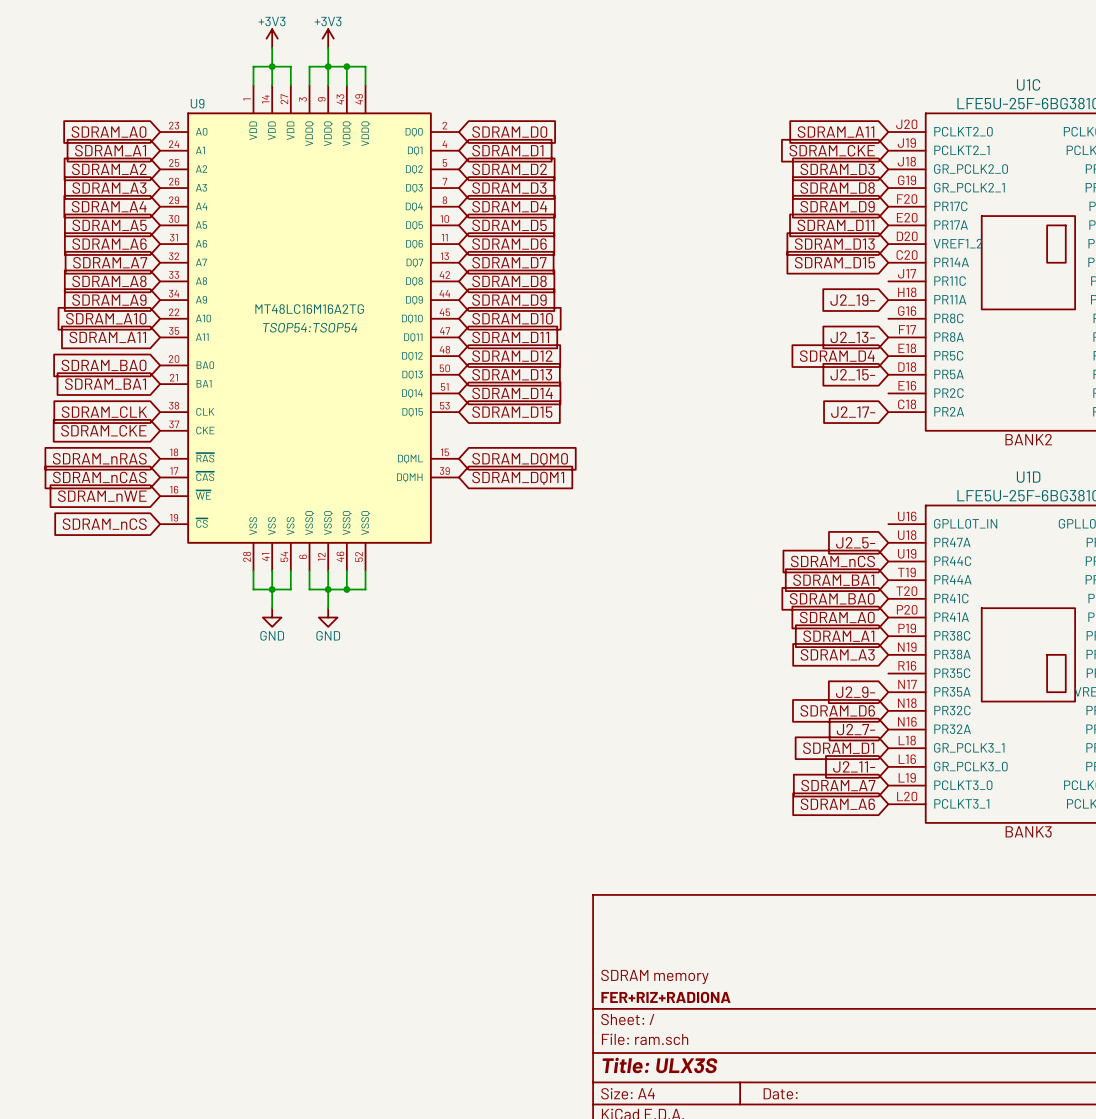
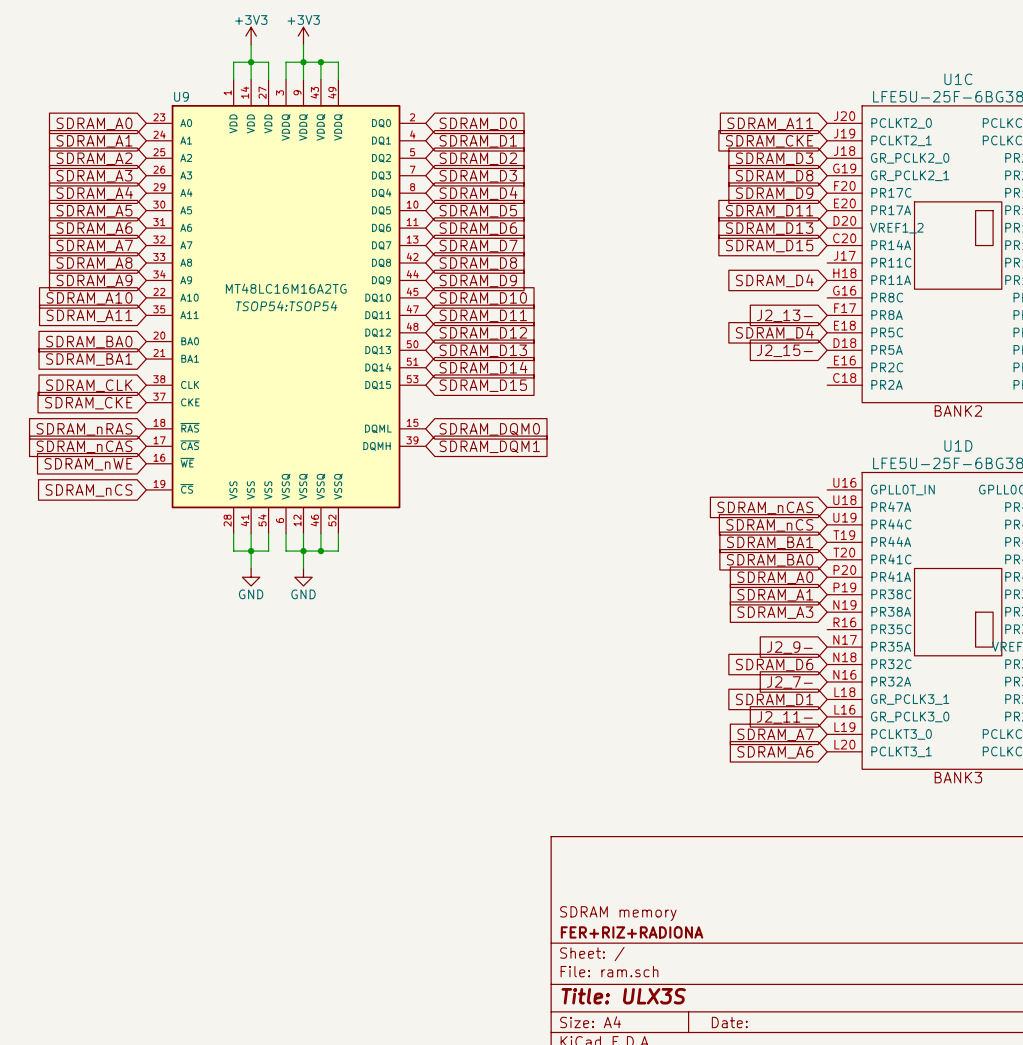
global label: J2_19- (852, 300) -> SDRAM_D4 (774, 280)
global label: J2_17- (853, 412) -> none
global label: J2_5- (855, 542) -> SDRAM_nCAS (765, 507)

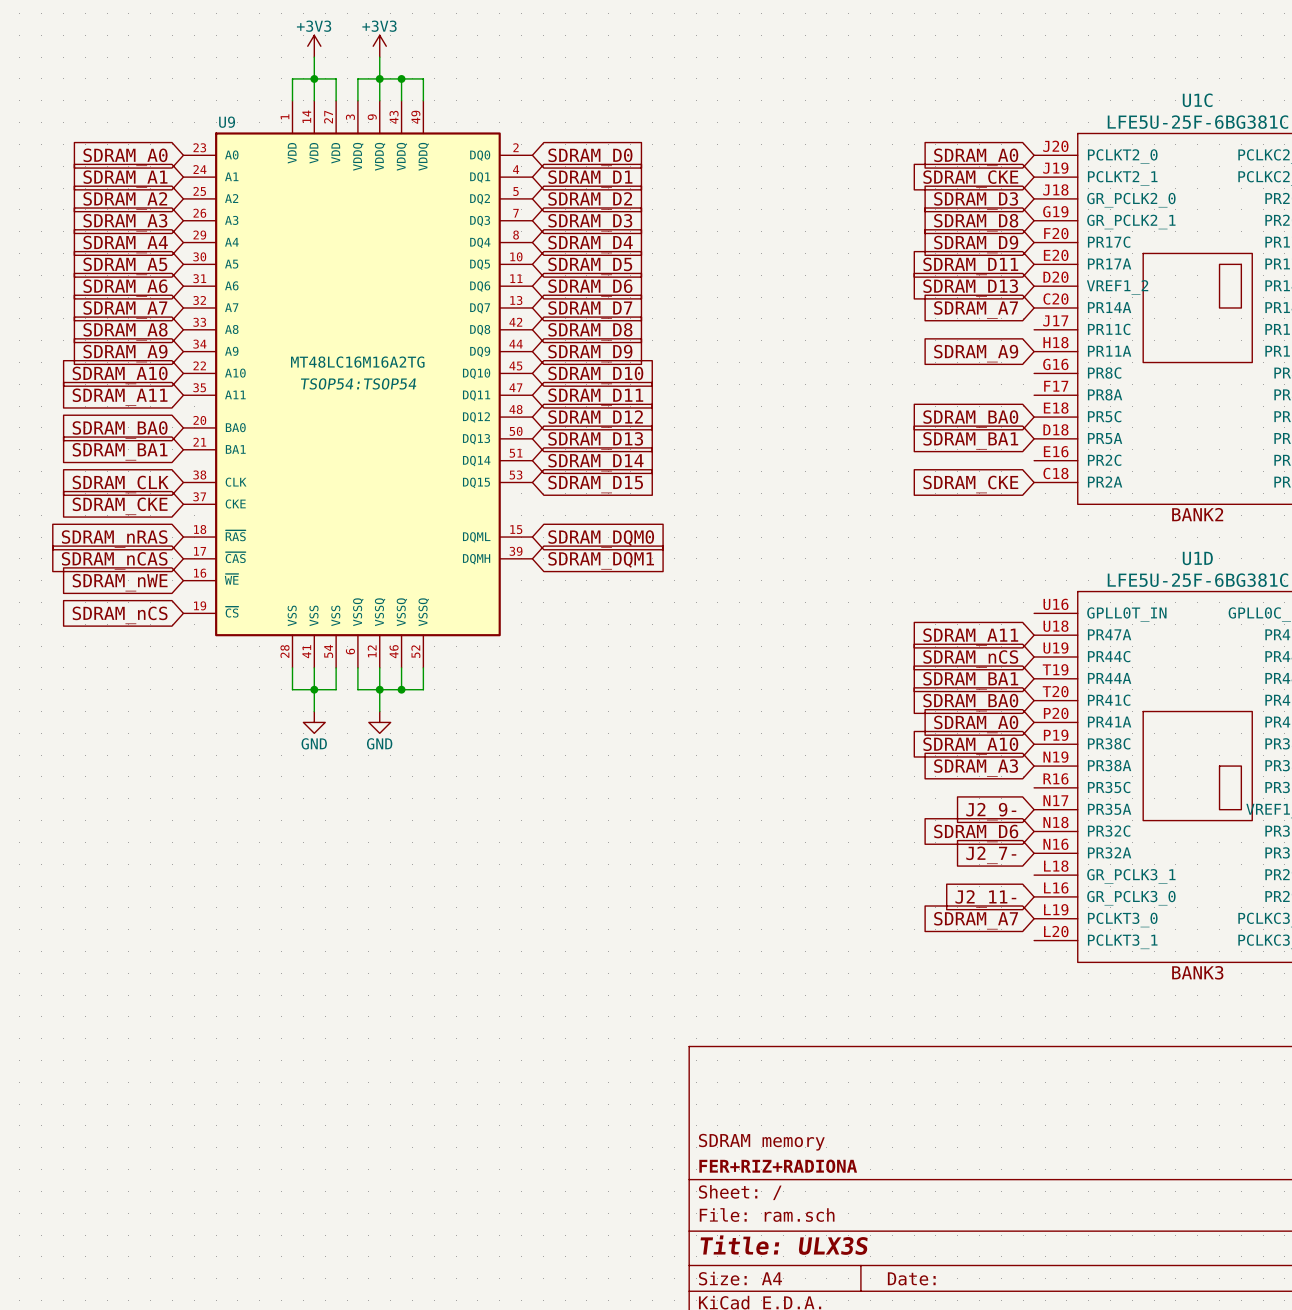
global label: SDRAM_A11 (770, 123) -> SDRAM_A0 (976, 157)
global label: SDRAM_D15 (769, 246) -> SDRAM_A7 (976, 309)
global label: SDRAM_D4 (774, 280) -> SDRAM_A9 (976, 353)
global label: J2_13- (784, 315) -> none
global label: SDRAM_D4 (774, 333) -> SDRAM_BA0 (970, 419)
global label: J2_15- (784, 350) -> SDRAM_BA1 (970, 440)
global label: none -> SDRAM_CKE (970, 484)
global label: SDRAM_nCAS (765, 507) -> SDRAM_A11 (970, 637)
global label: SDRAM_A1 (775, 595) -> SDRAM_A10 (970, 746)
global label: SDRAM_D1 (774, 699) -> none
global label: SDRAM_A6 (775, 752) -> none

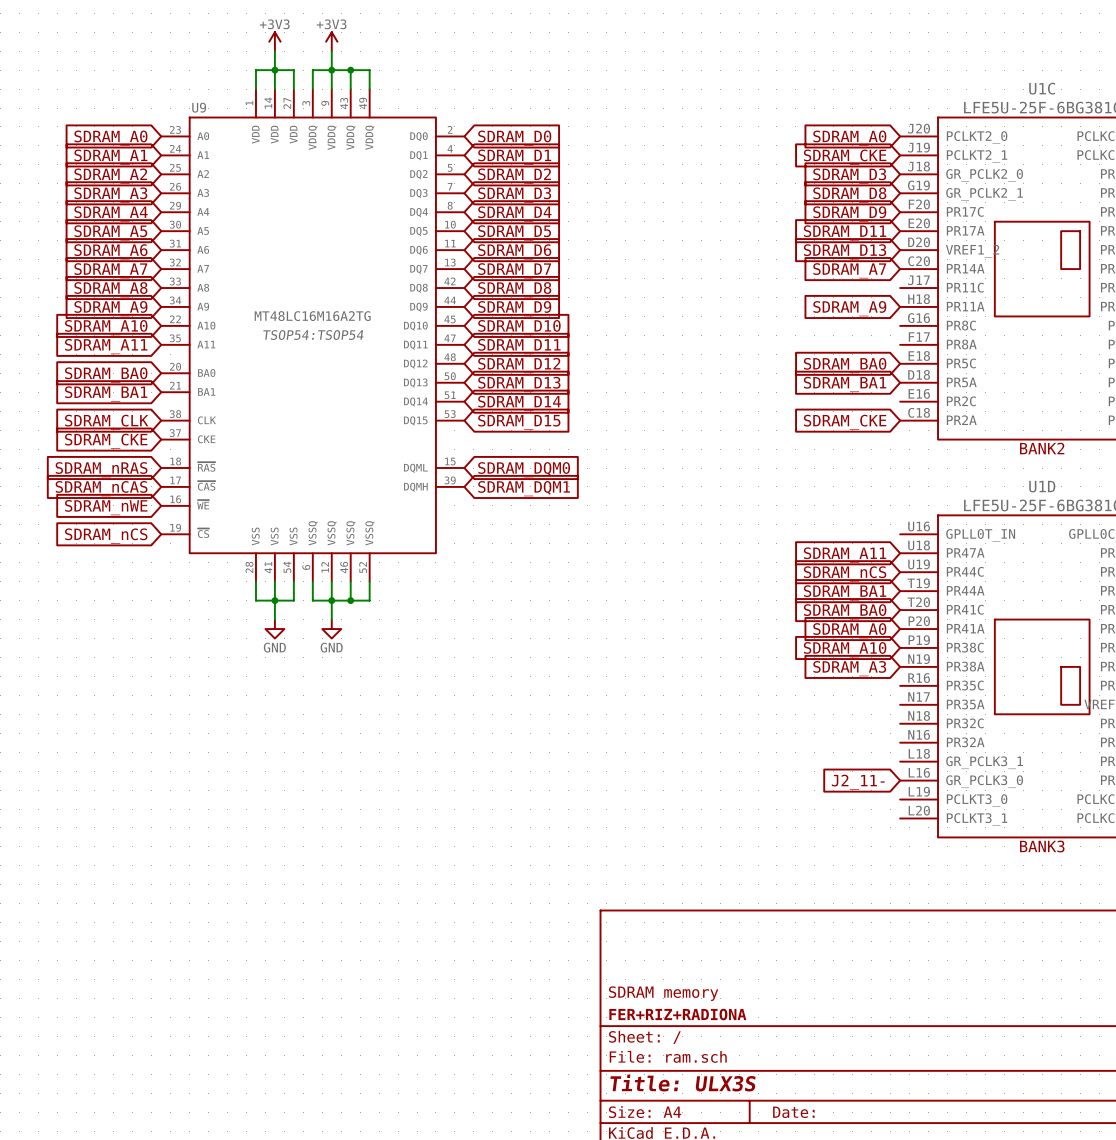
global label: J2_9- (991, 811) -> none
global label: SDRAM_D6 (976, 833) -> none
global label: J2_7- (991, 855) -> none
global label: SDRAM_A7 (976, 920) -> none

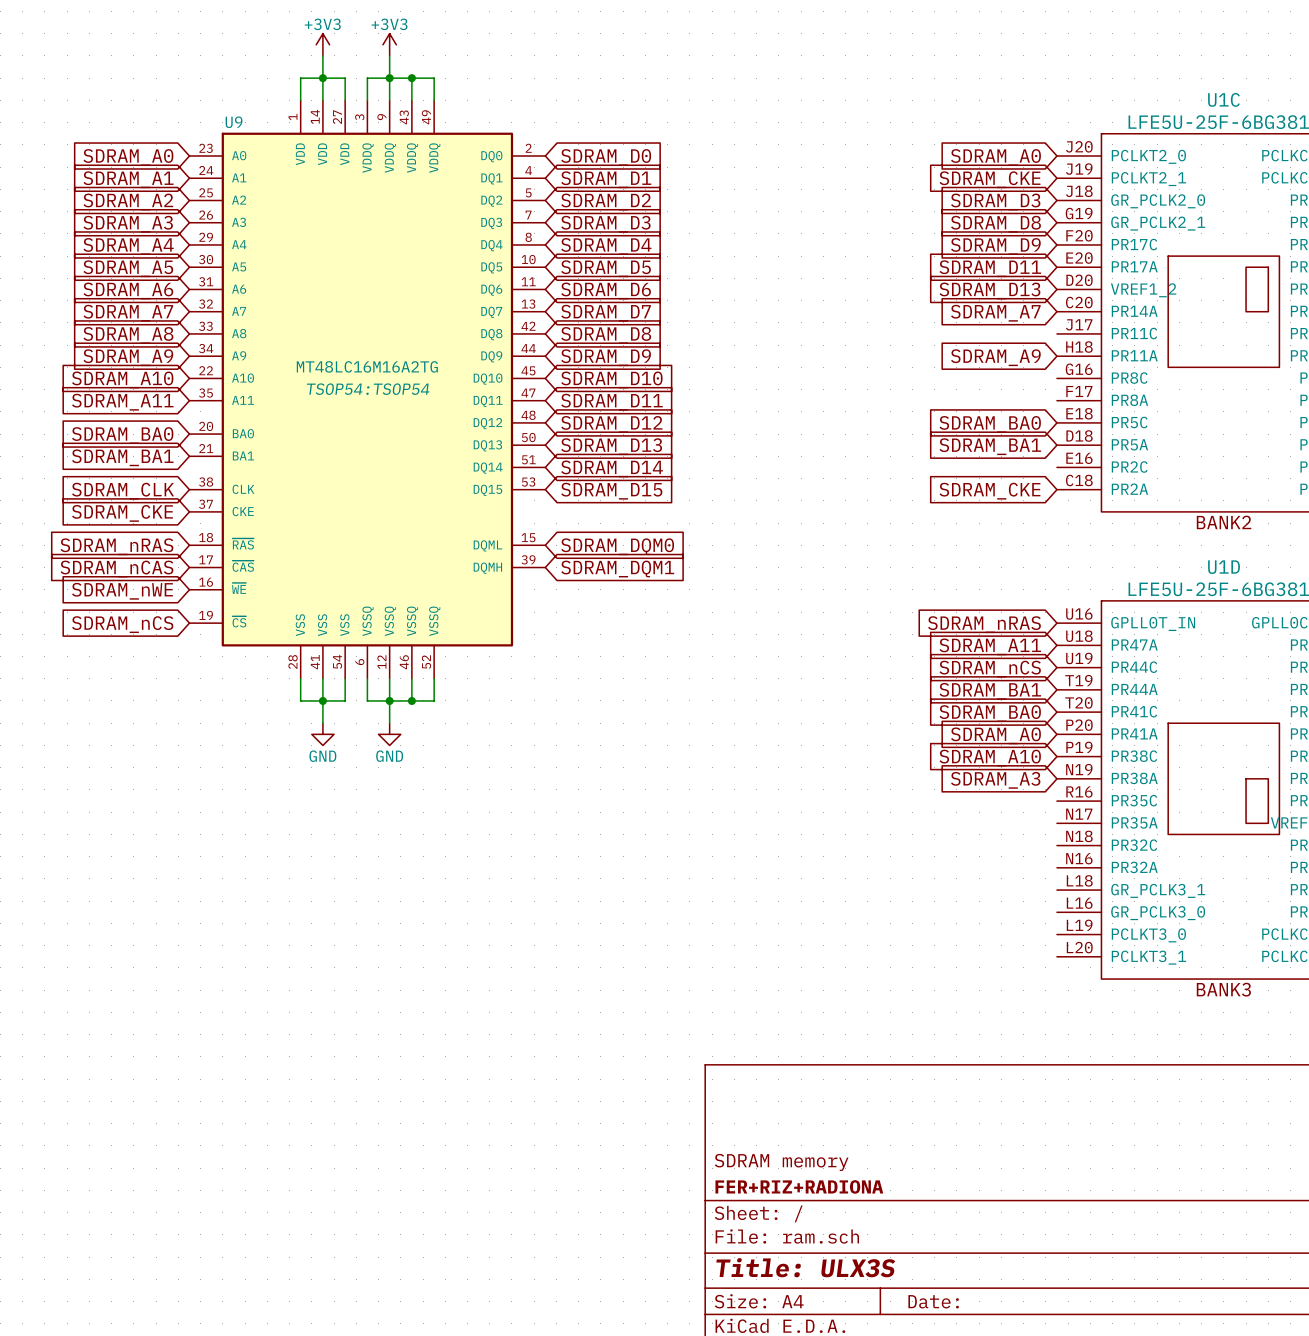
global label: none -> SDRAM_nRAS (984, 624)
global label: J2_11- (858, 782) -> none

